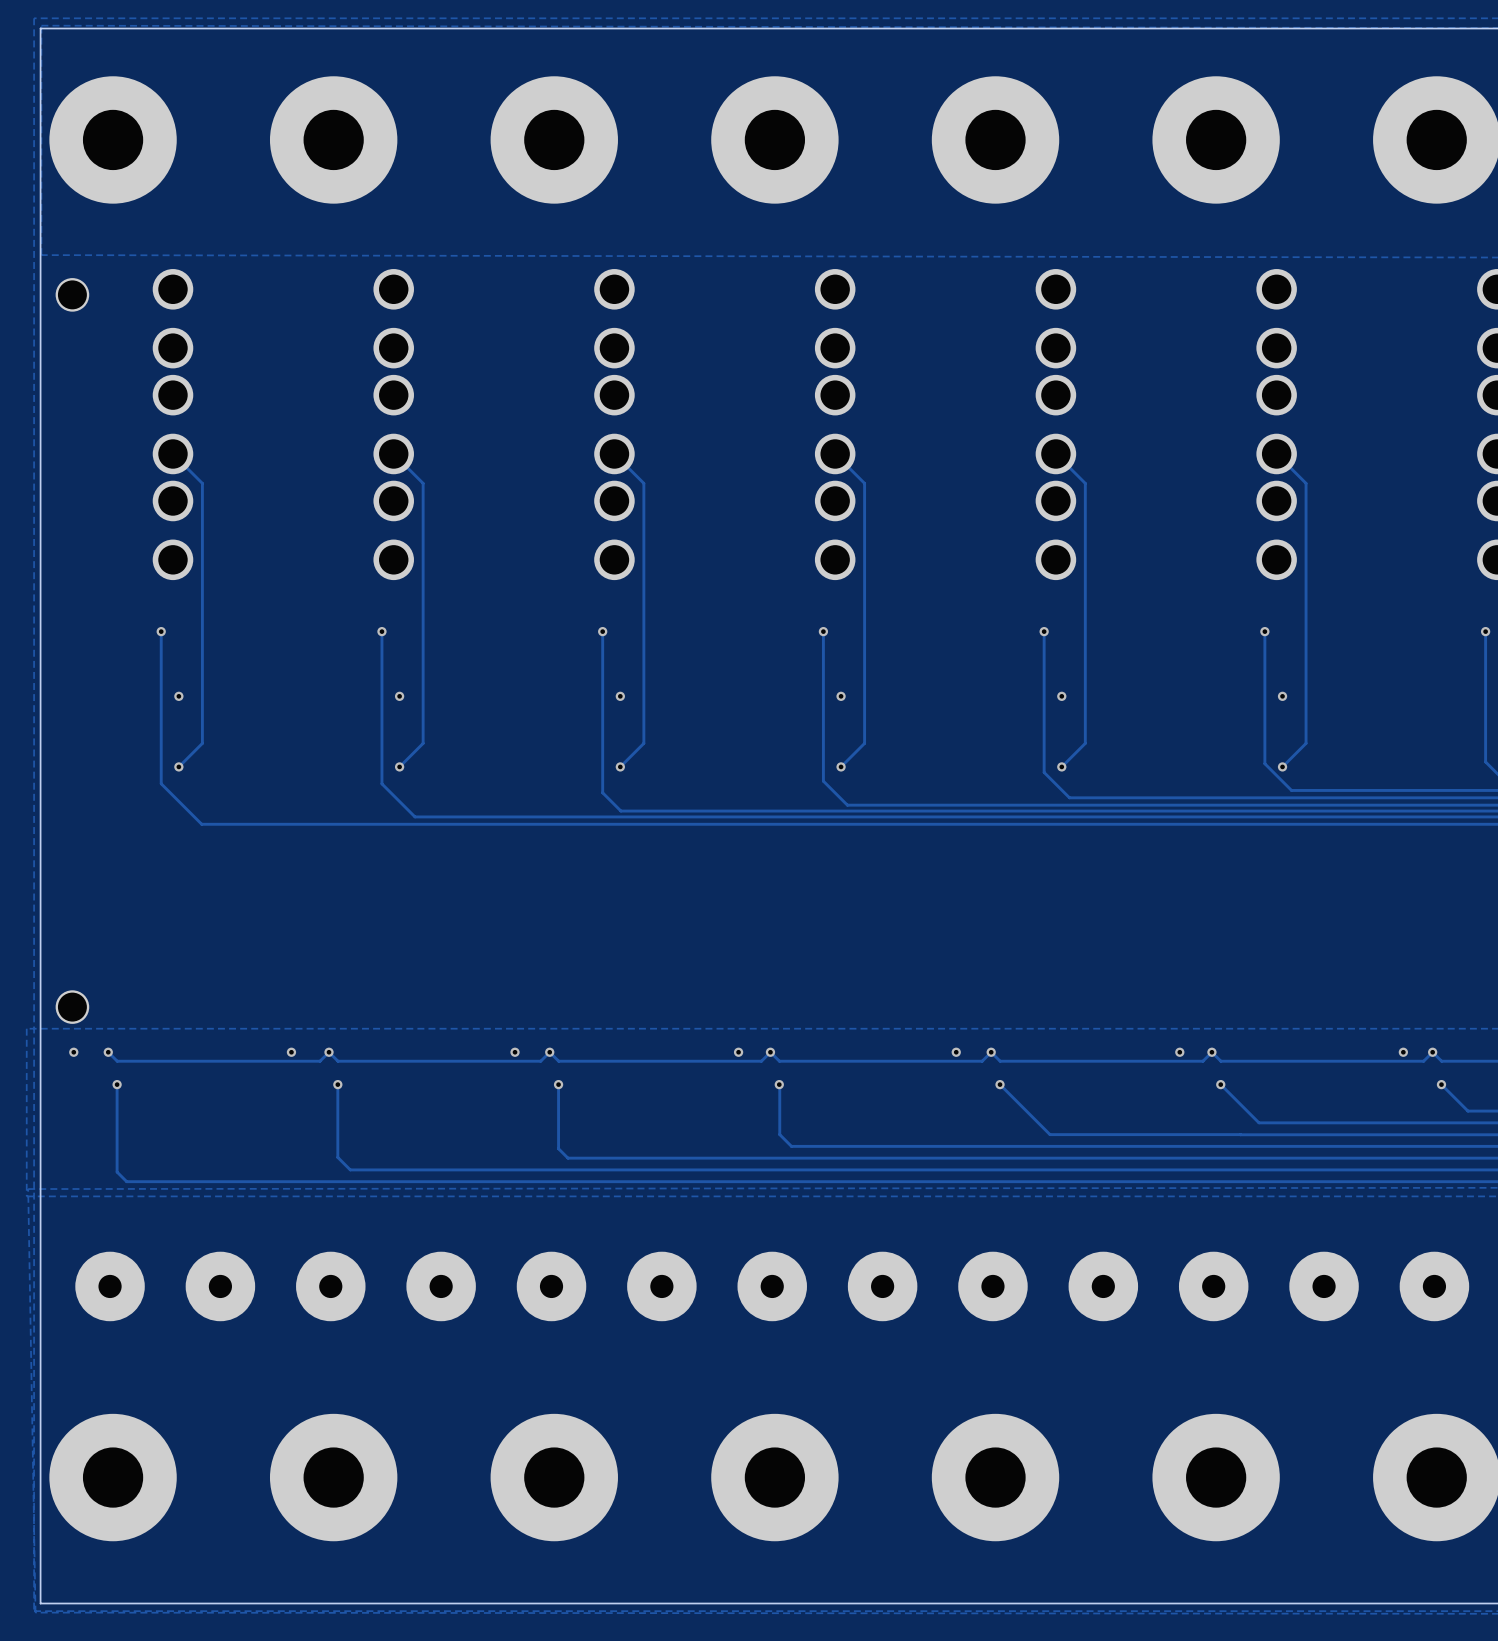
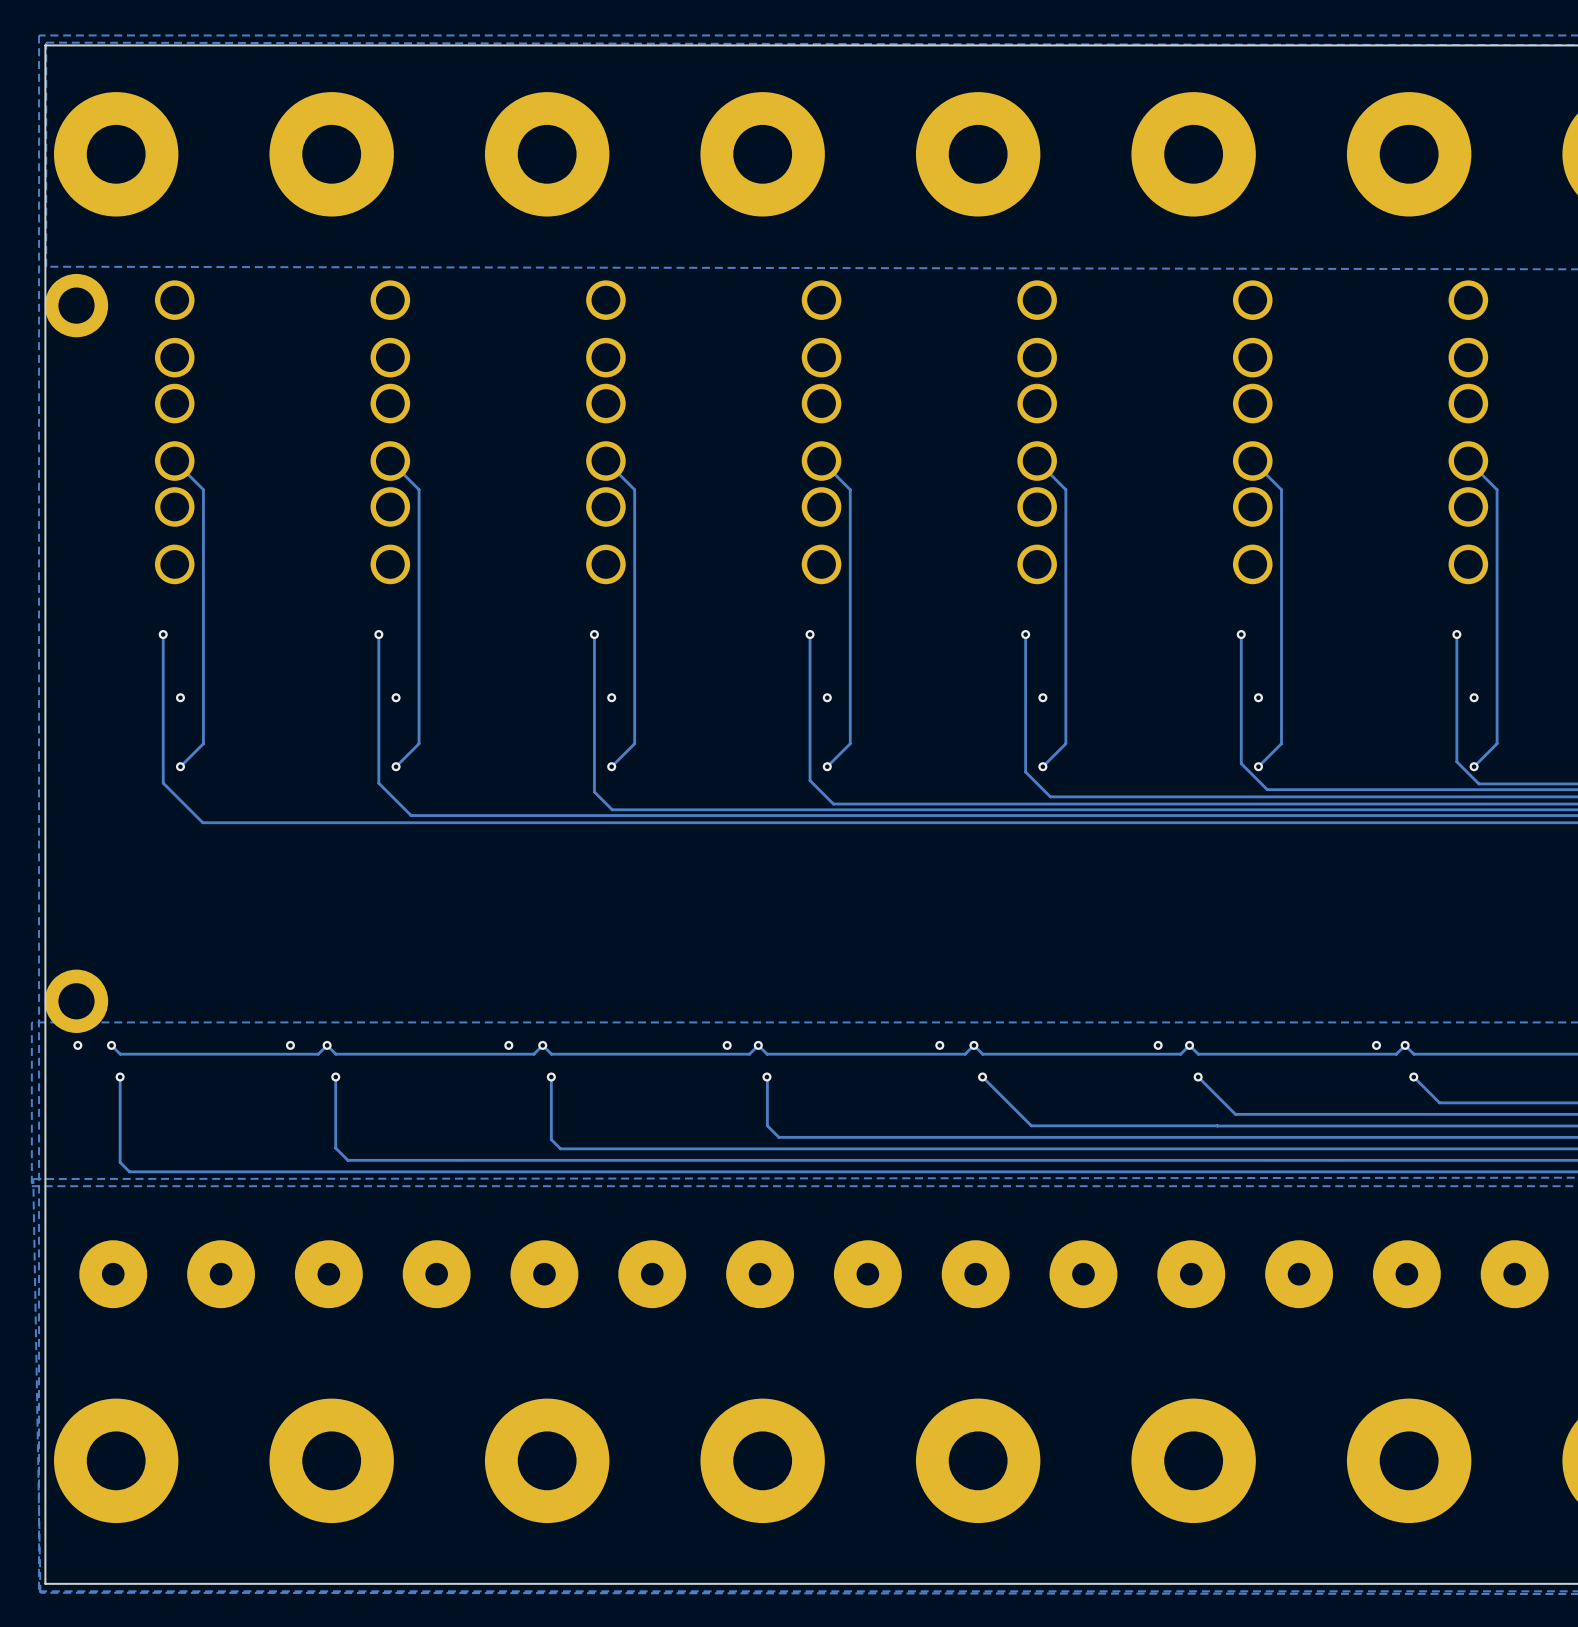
part footprint: [55, 278, 90, 312] -> [44, 273, 109, 338]
part footprint: [55, 990, 90, 1024] -> [44, 969, 109, 1033]

